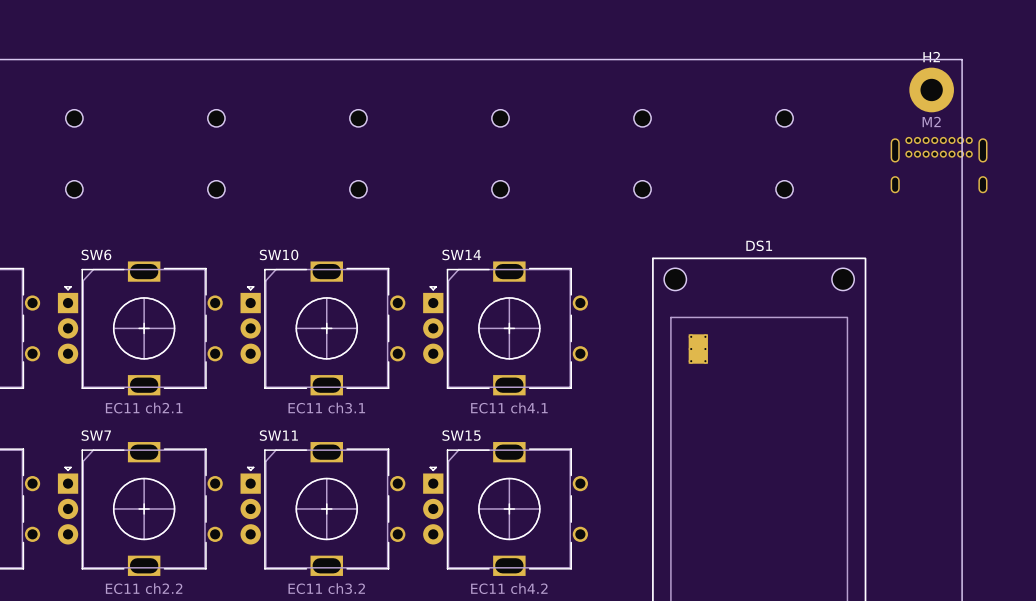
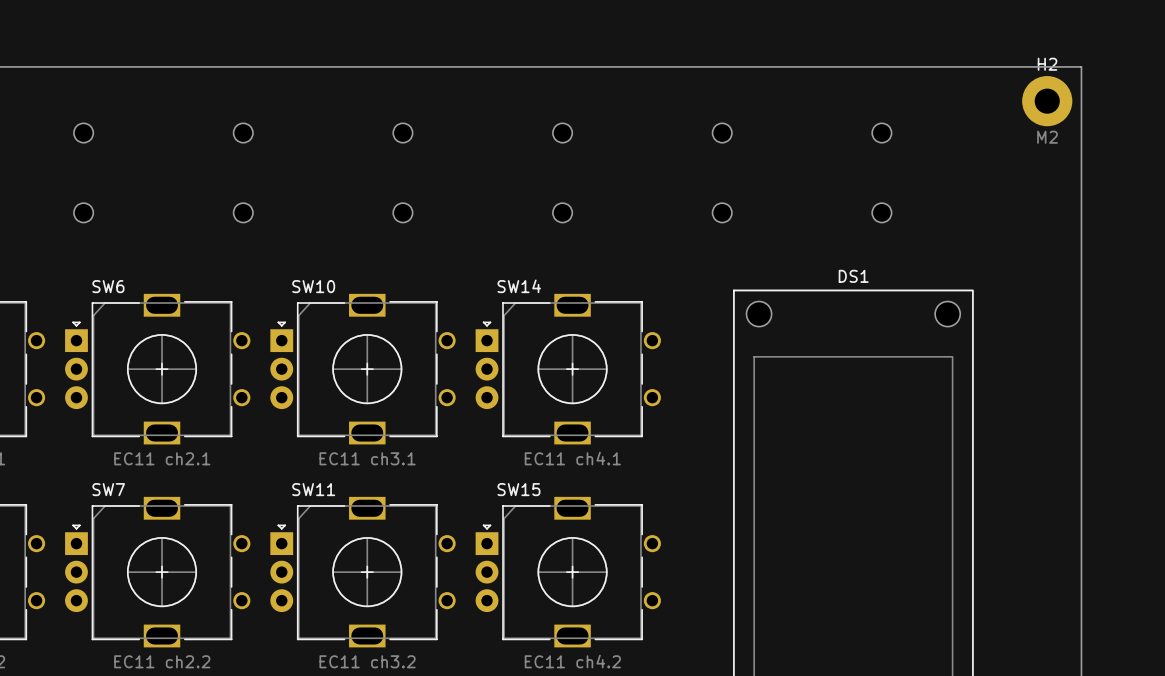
part: (939, 165) -> none
part: (698, 349) -> none

